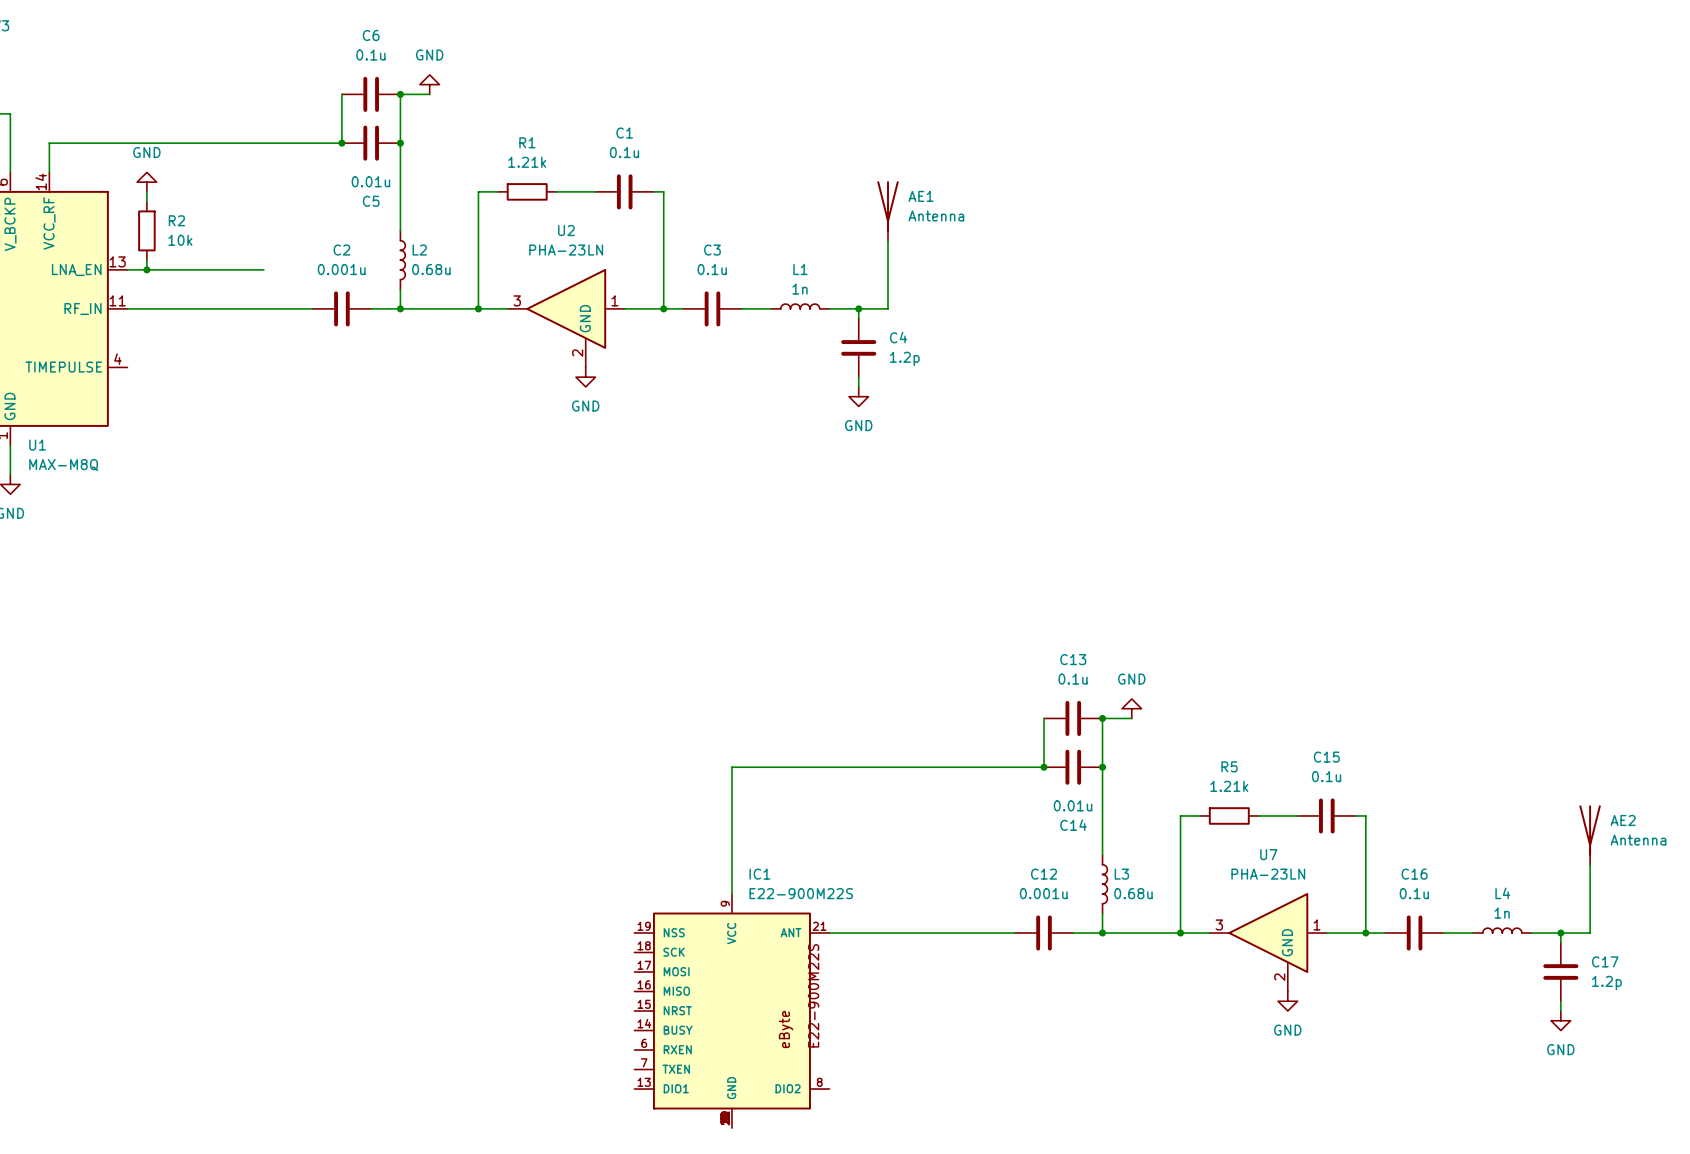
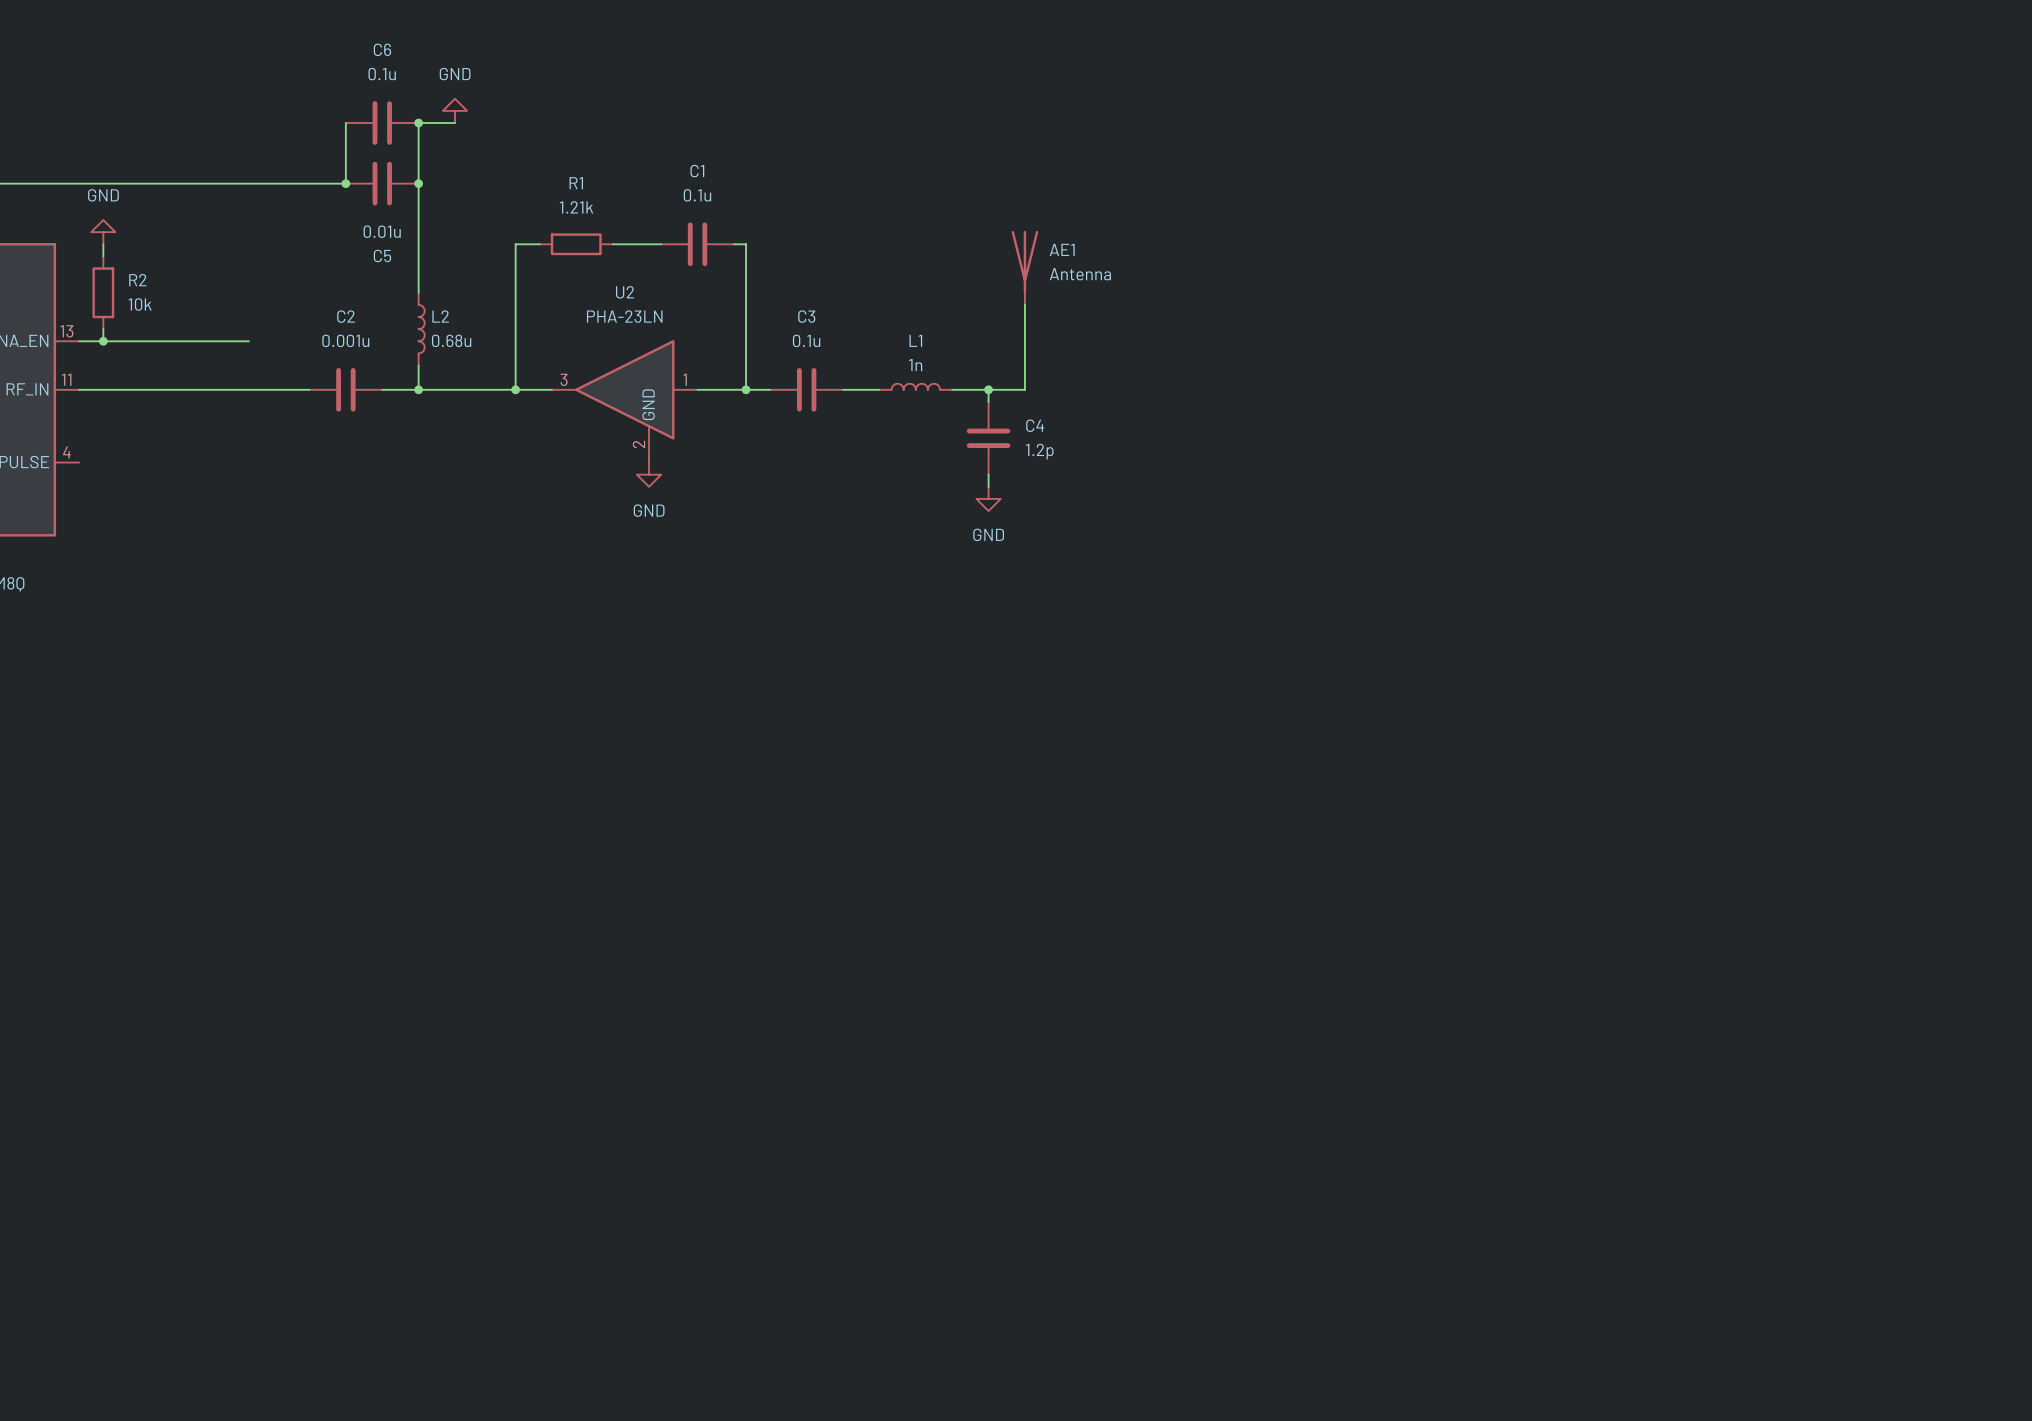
power symbol: GND (1131, 708) -> none
wire: (1044, 718) (1044, 767) (731, 767) (731, 893) -> none
C13: 0.1u (1073, 718) -> none
junction: (1102, 718) -> none
wire: (1131, 718) (1102, 718) (1102, 854) -> none
junction: (1044, 767) -> none
C14: 0.01u (1073, 767) -> none
junction: (1102, 767) -> none
wire: (1200, 815) (1180, 815) (1180, 933) -> none
R5: 1.21k (1229, 815) -> none
wire: (1258, 815) (1297, 815) -> none
C15: 0.1u (1326, 815) -> none
wire: (1356, 815) (1365, 815) (1365, 933) -> none
AE2: Antenna (1590, 835) -> none
wire: (1590, 864) (1590, 933) (1531, 933) -> none
L3: 0.68u (1104, 884) -> none
wire: (1102, 913) (1102, 933) -> none
L4: 1n (1502, 930) -> none
wire: (829, 933) (1014, 933) -> none
C12: 0.001u (1044, 933) -> none
wire: (1073, 933) (1209, 933) -> none
junction: (1102, 933) -> none
junction: (1180, 933) -> none
wire: (1326, 933) (1385, 933) -> none
junction: (1365, 933) -> none
C16: 0.1u (1414, 933) -> none
wire: (1443, 933) (1473, 933) -> none
wire: (1560, 933) (1560, 942) -> none
junction: (1560, 933) -> none
U7: PHA-23LN (1268, 942) -> none
C17: 1.2p (1560, 972) -> none
power symbol: GND (1287, 1001) -> none
wire: (1560, 1001) (1560, 1011) -> none
IC1: E22-900M22S (731, 1011) -> none
power symbol: GND (1560, 1020) -> none

